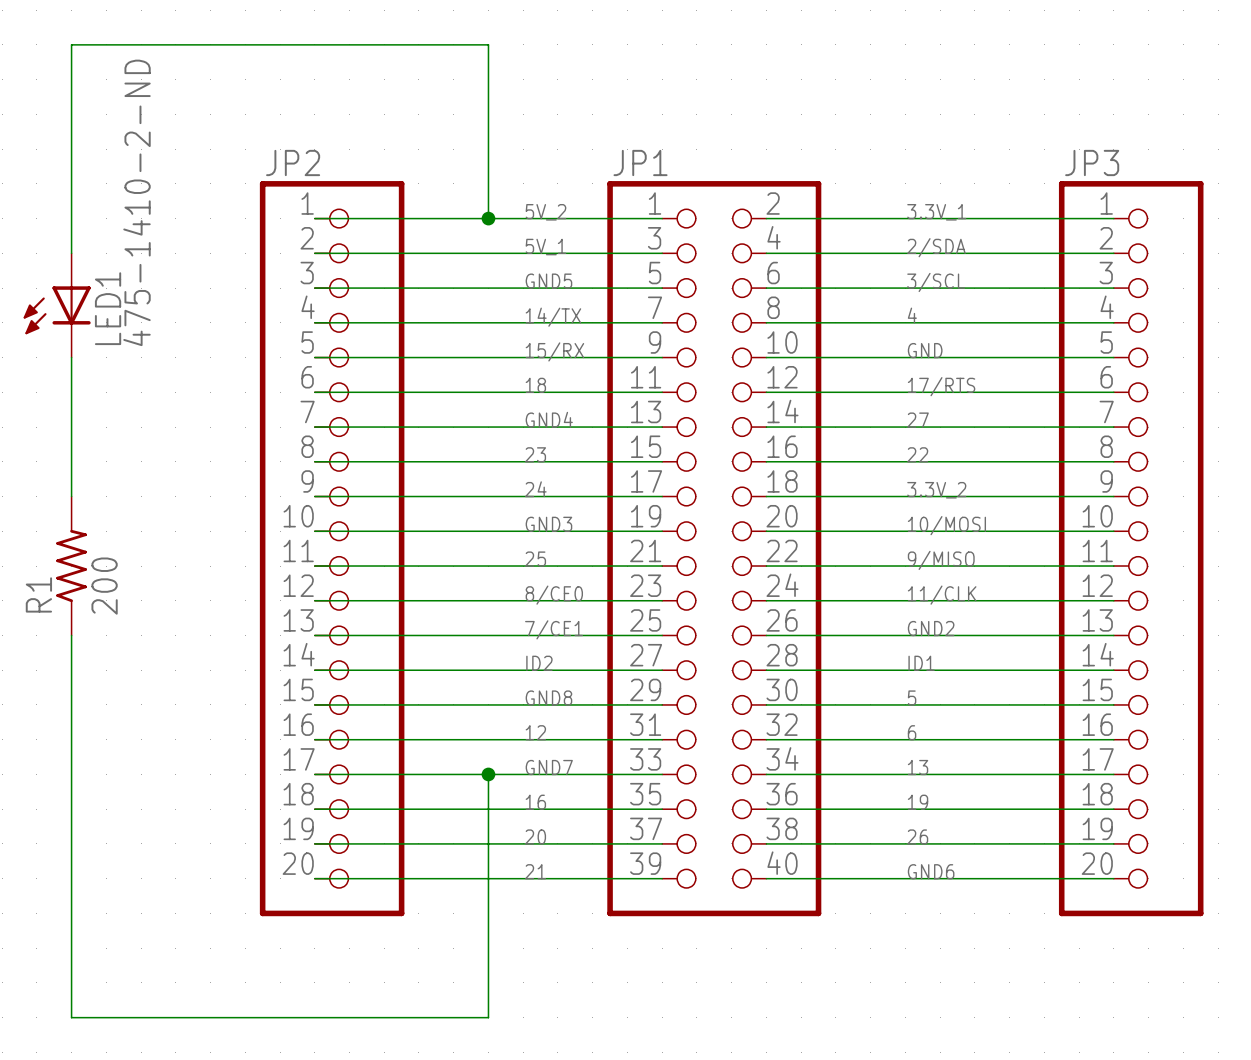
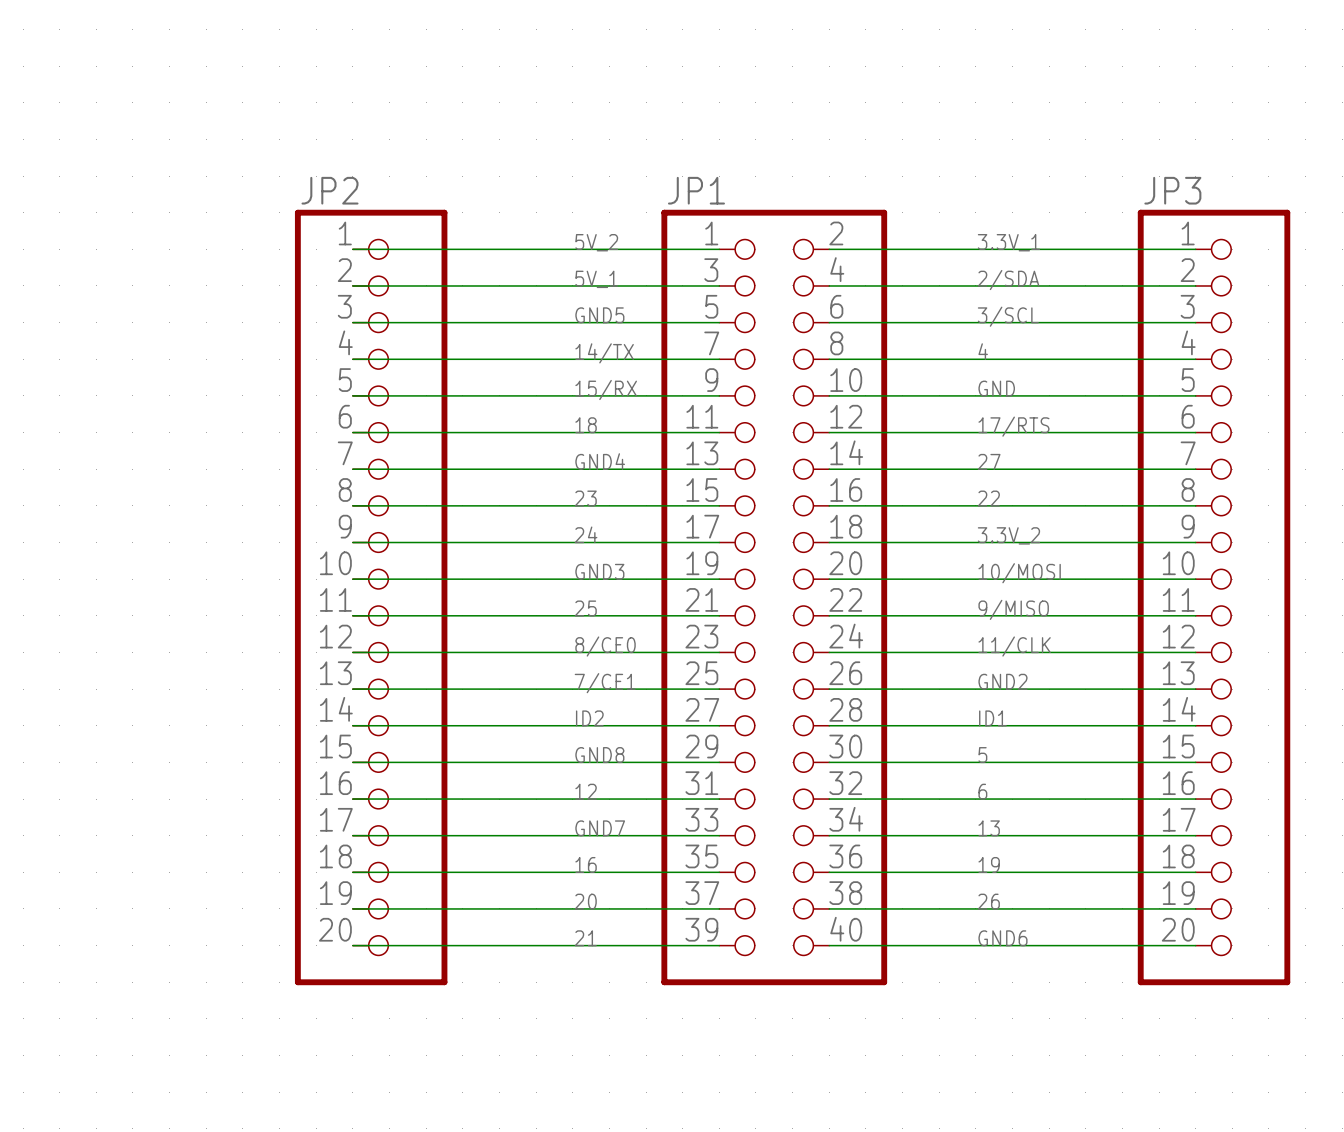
wire: (488, 218) (488, 44) (71, 44) (71, 253) -> none
junction: (488, 218) -> none
LED1: 475-1410-2-ND (57, 305) -> none
wire: (71, 357) (71, 496) -> none
R1: 200 (71, 566) -> none
wire: (71, 635) (71, 1017) (488, 1017) (488, 774) -> none
junction: (488, 774) -> none

